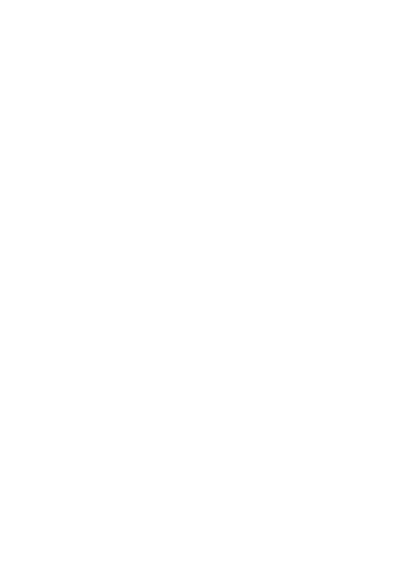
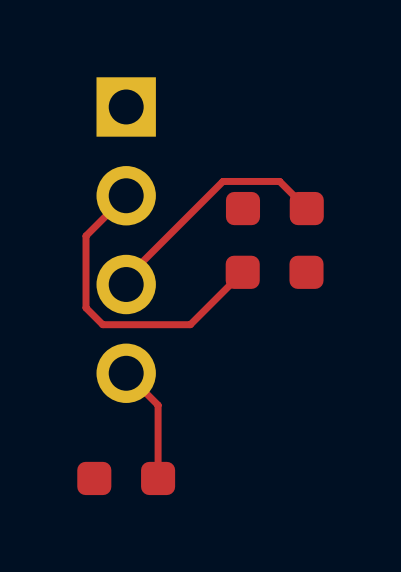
top track: none -> (126, 195) (86, 235) (86, 307) (102, 324) (190, 324) (242, 272)
part: none -> (274, 208)
top track: none -> (306, 208) (279, 181) (222, 181) (126, 278) (126, 284)
part: none -> (126, 240)
part: none -> (274, 272)
top track: none -> (126, 373) (158, 405) (158, 478)
part: none -> (126, 478)

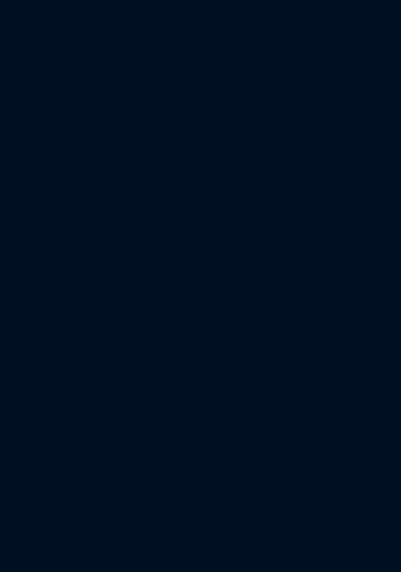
top track: (126, 195) (86, 235) (86, 307) (102, 324) (190, 324) (242, 272) -> none
part: (274, 208) -> none
top track: (306, 208) (279, 181) (222, 181) (126, 278) (126, 284) -> none
part: (126, 240) -> none
part: (274, 272) -> none
top track: (126, 373) (158, 405) (158, 478) -> none
part: (126, 478) -> none

